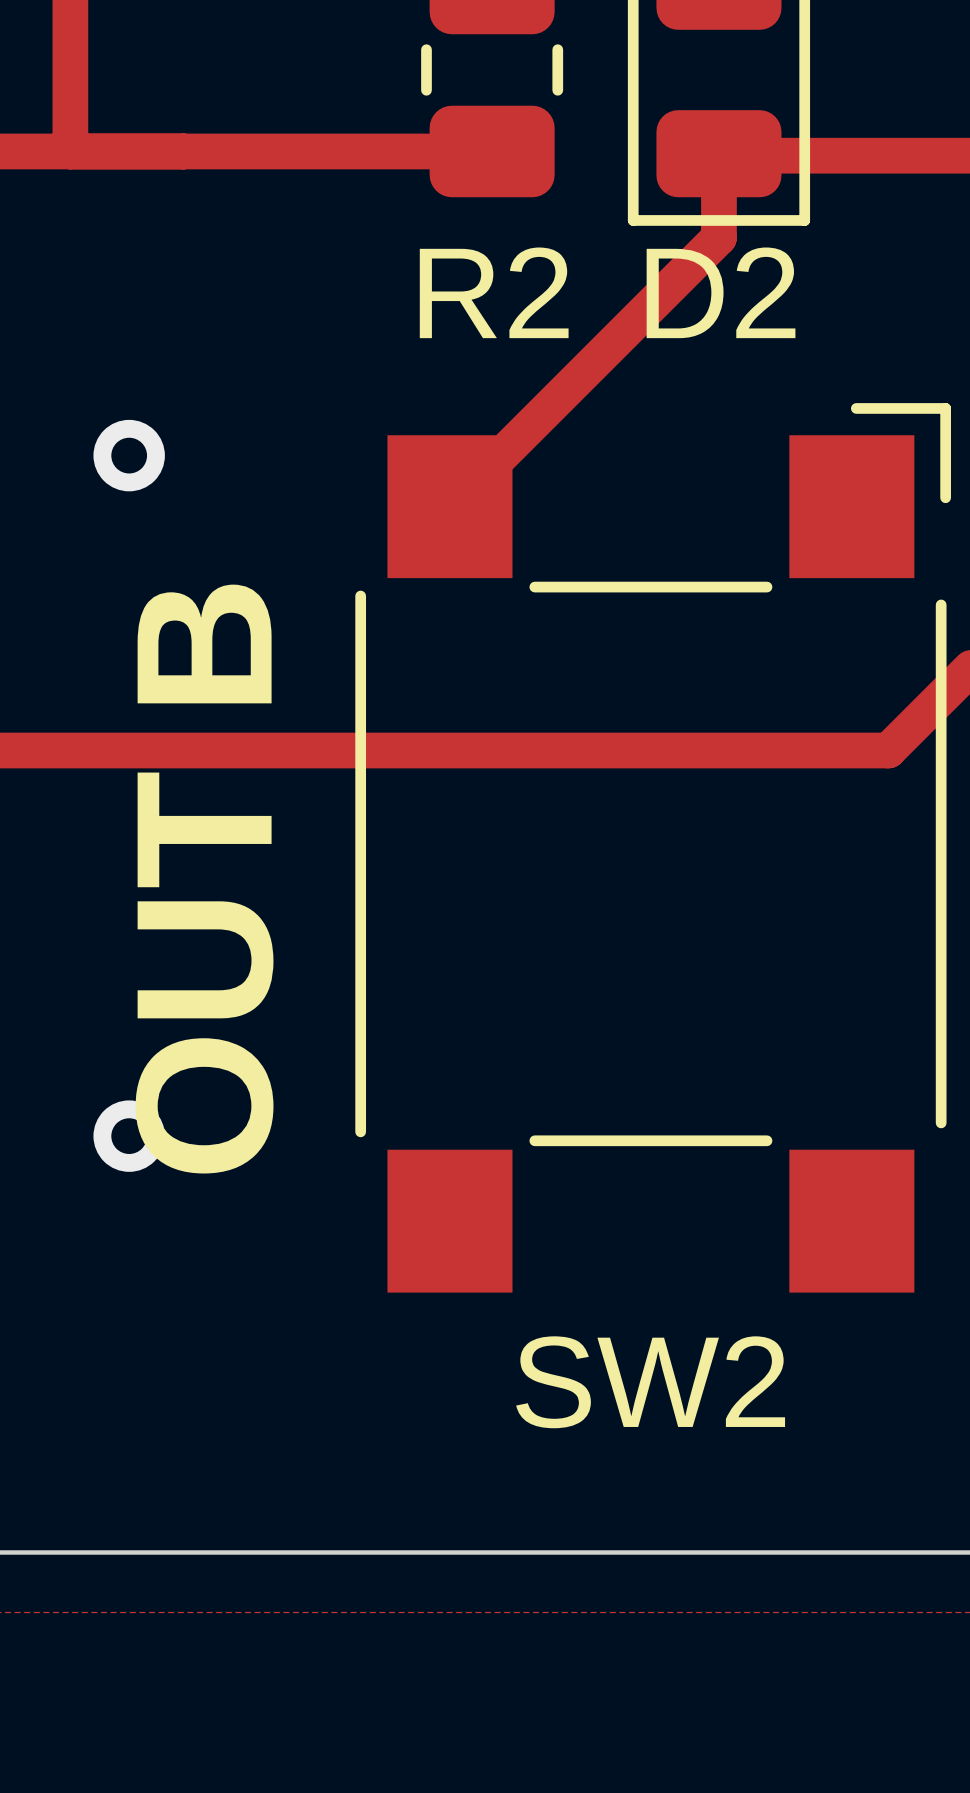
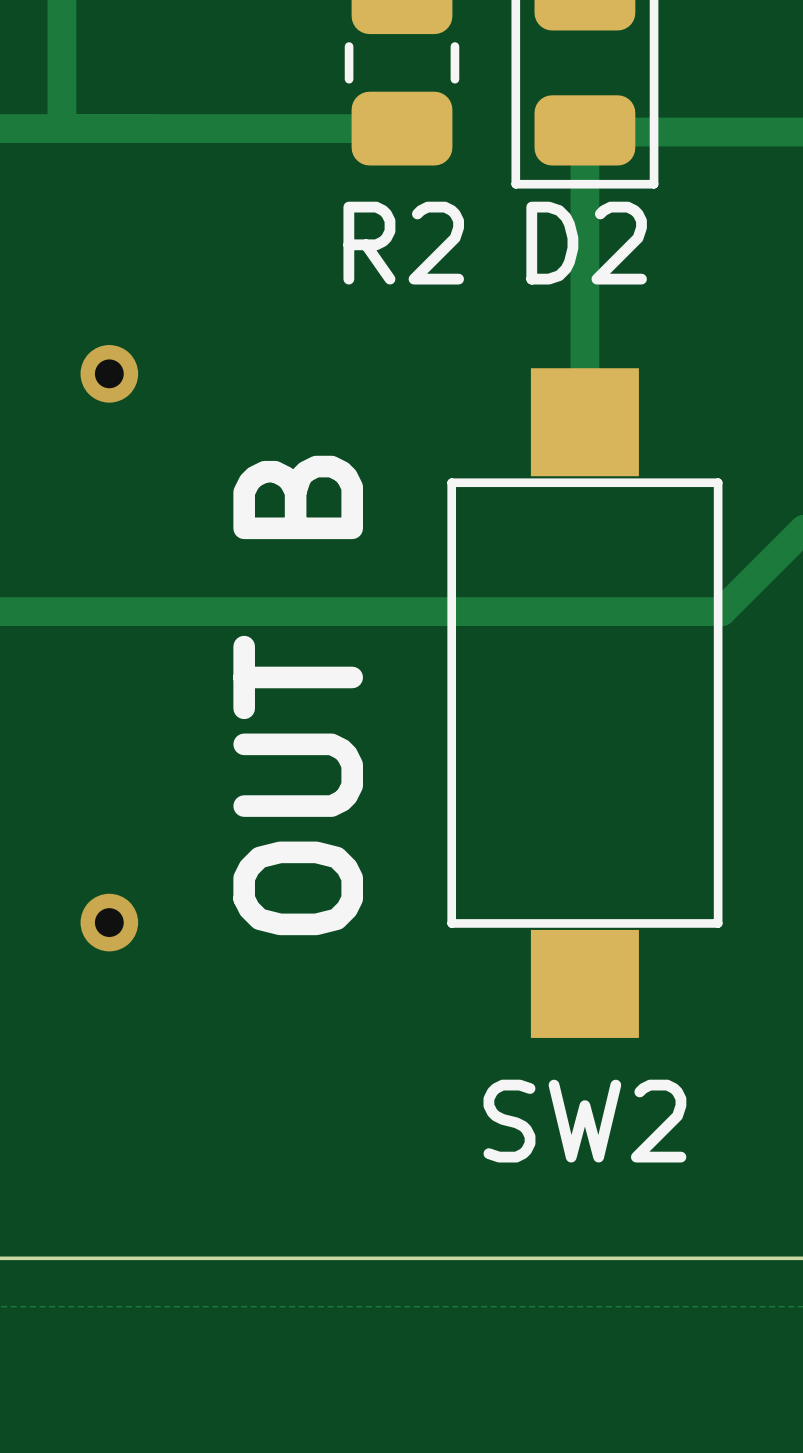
track: (718, 237) (449, 506) -> (584, 198) (584, 422)
SW2 footprint: [355, 403, 951, 1293] -> [447, 368, 723, 1038]
text position: OUT B (204, 879) -> OUT B (298, 695)

